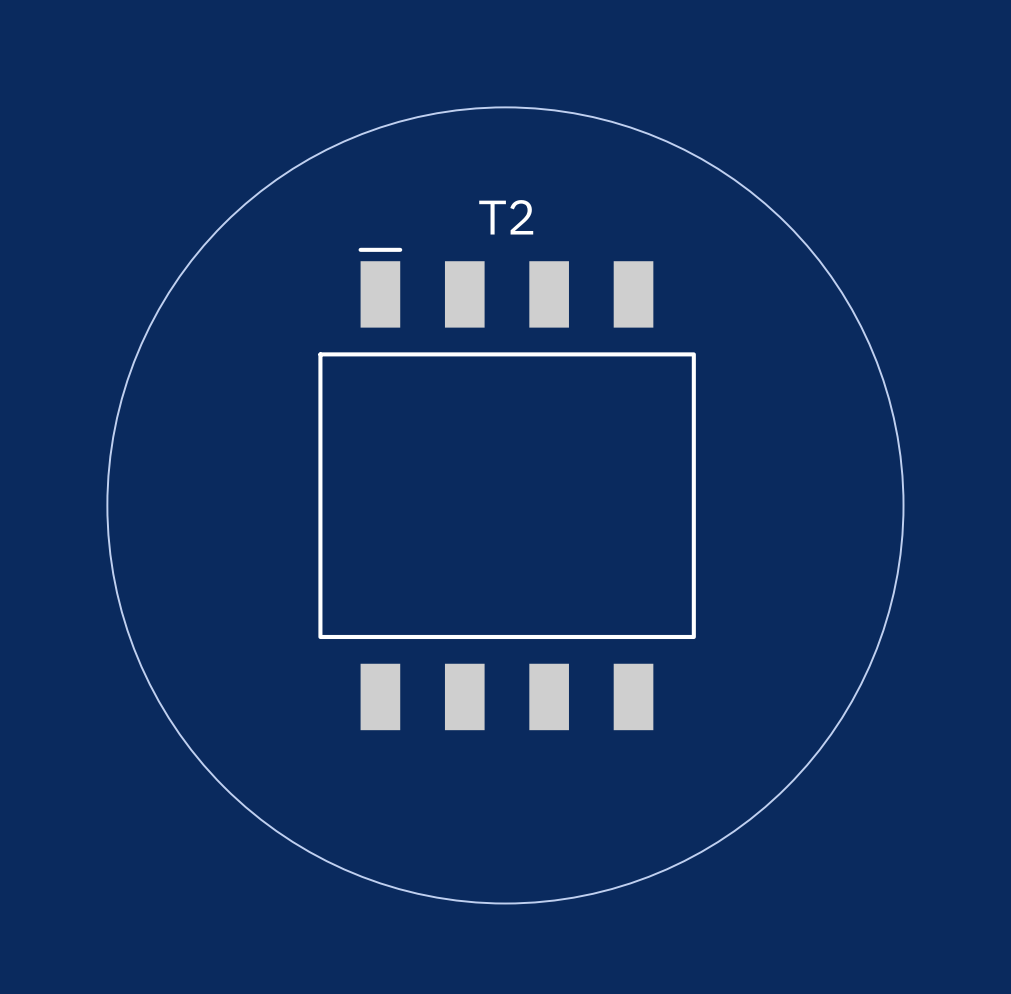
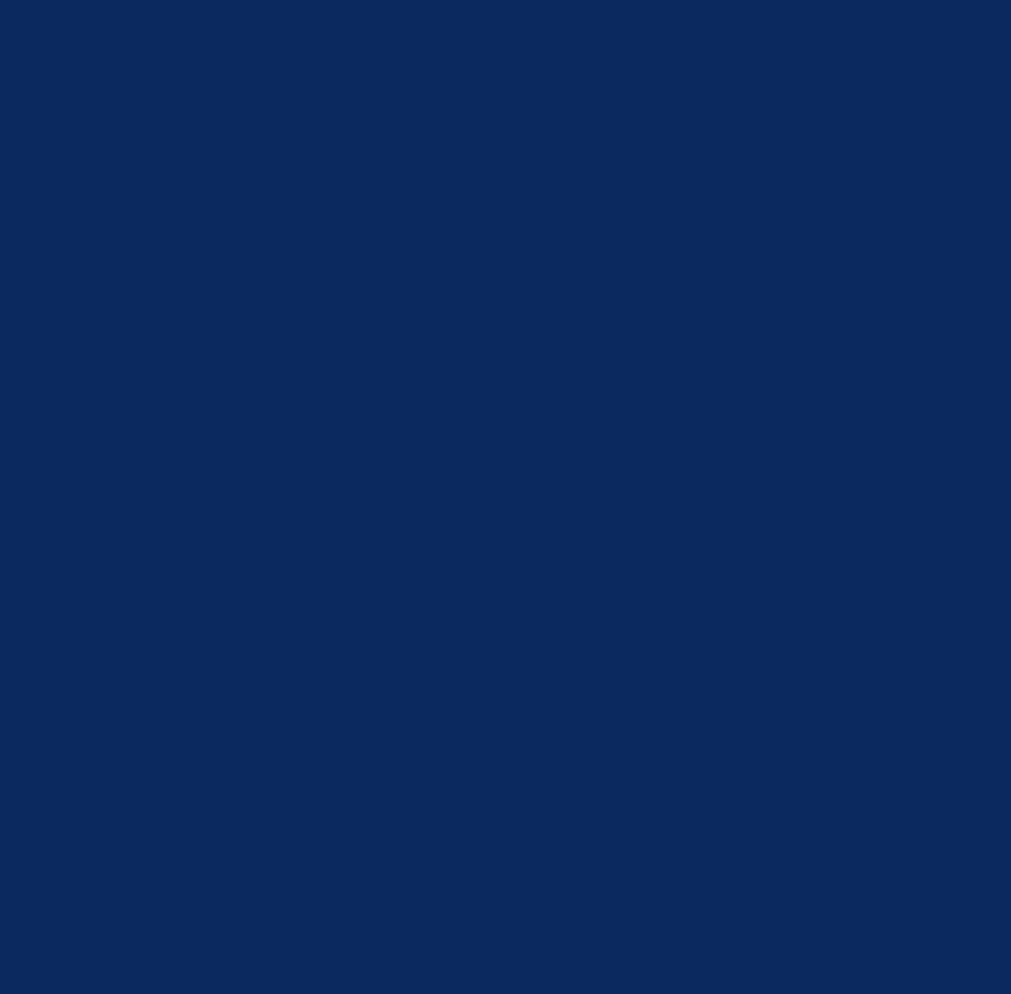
round board edge: [106, 106, 905, 905] -> none
T2: (507, 488) -> none

